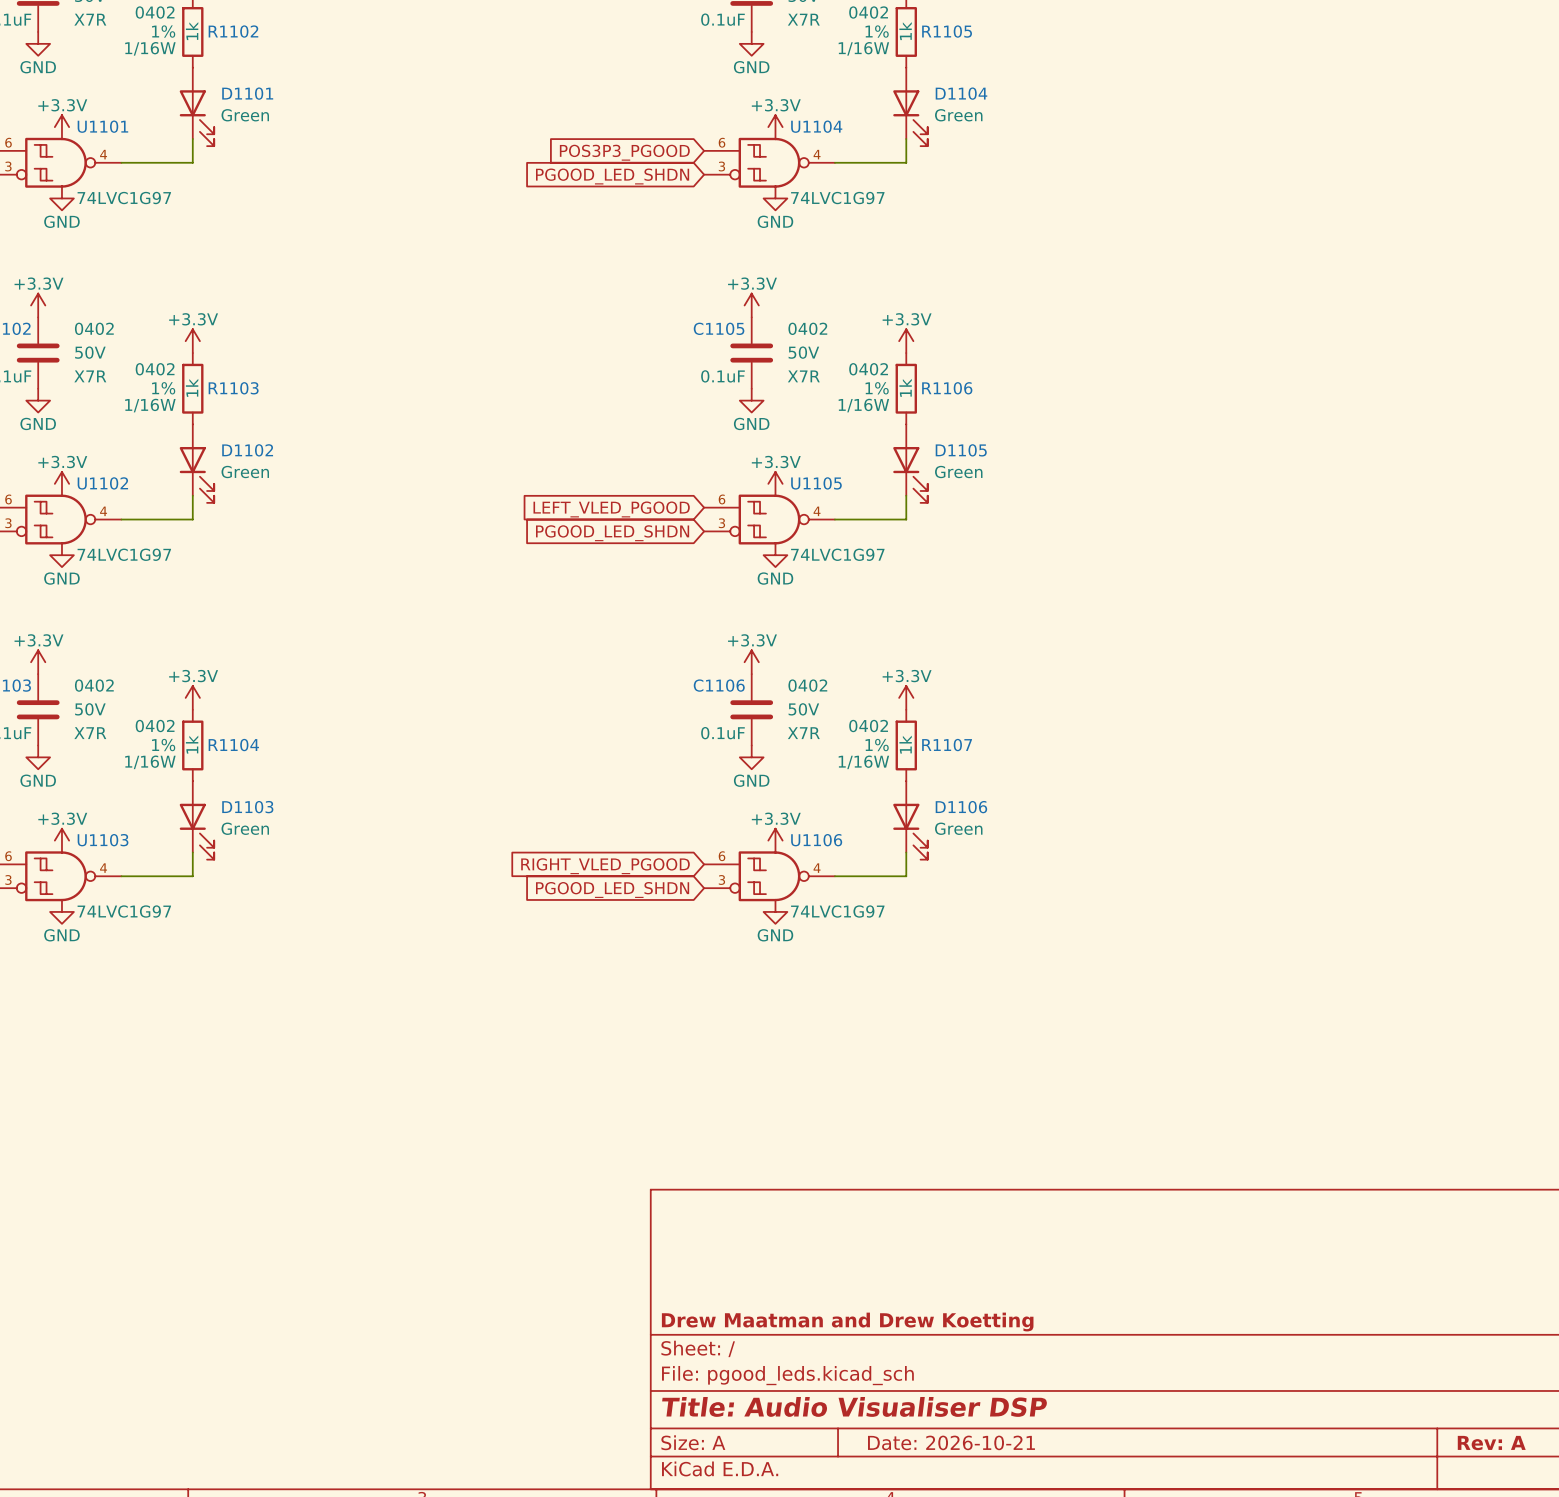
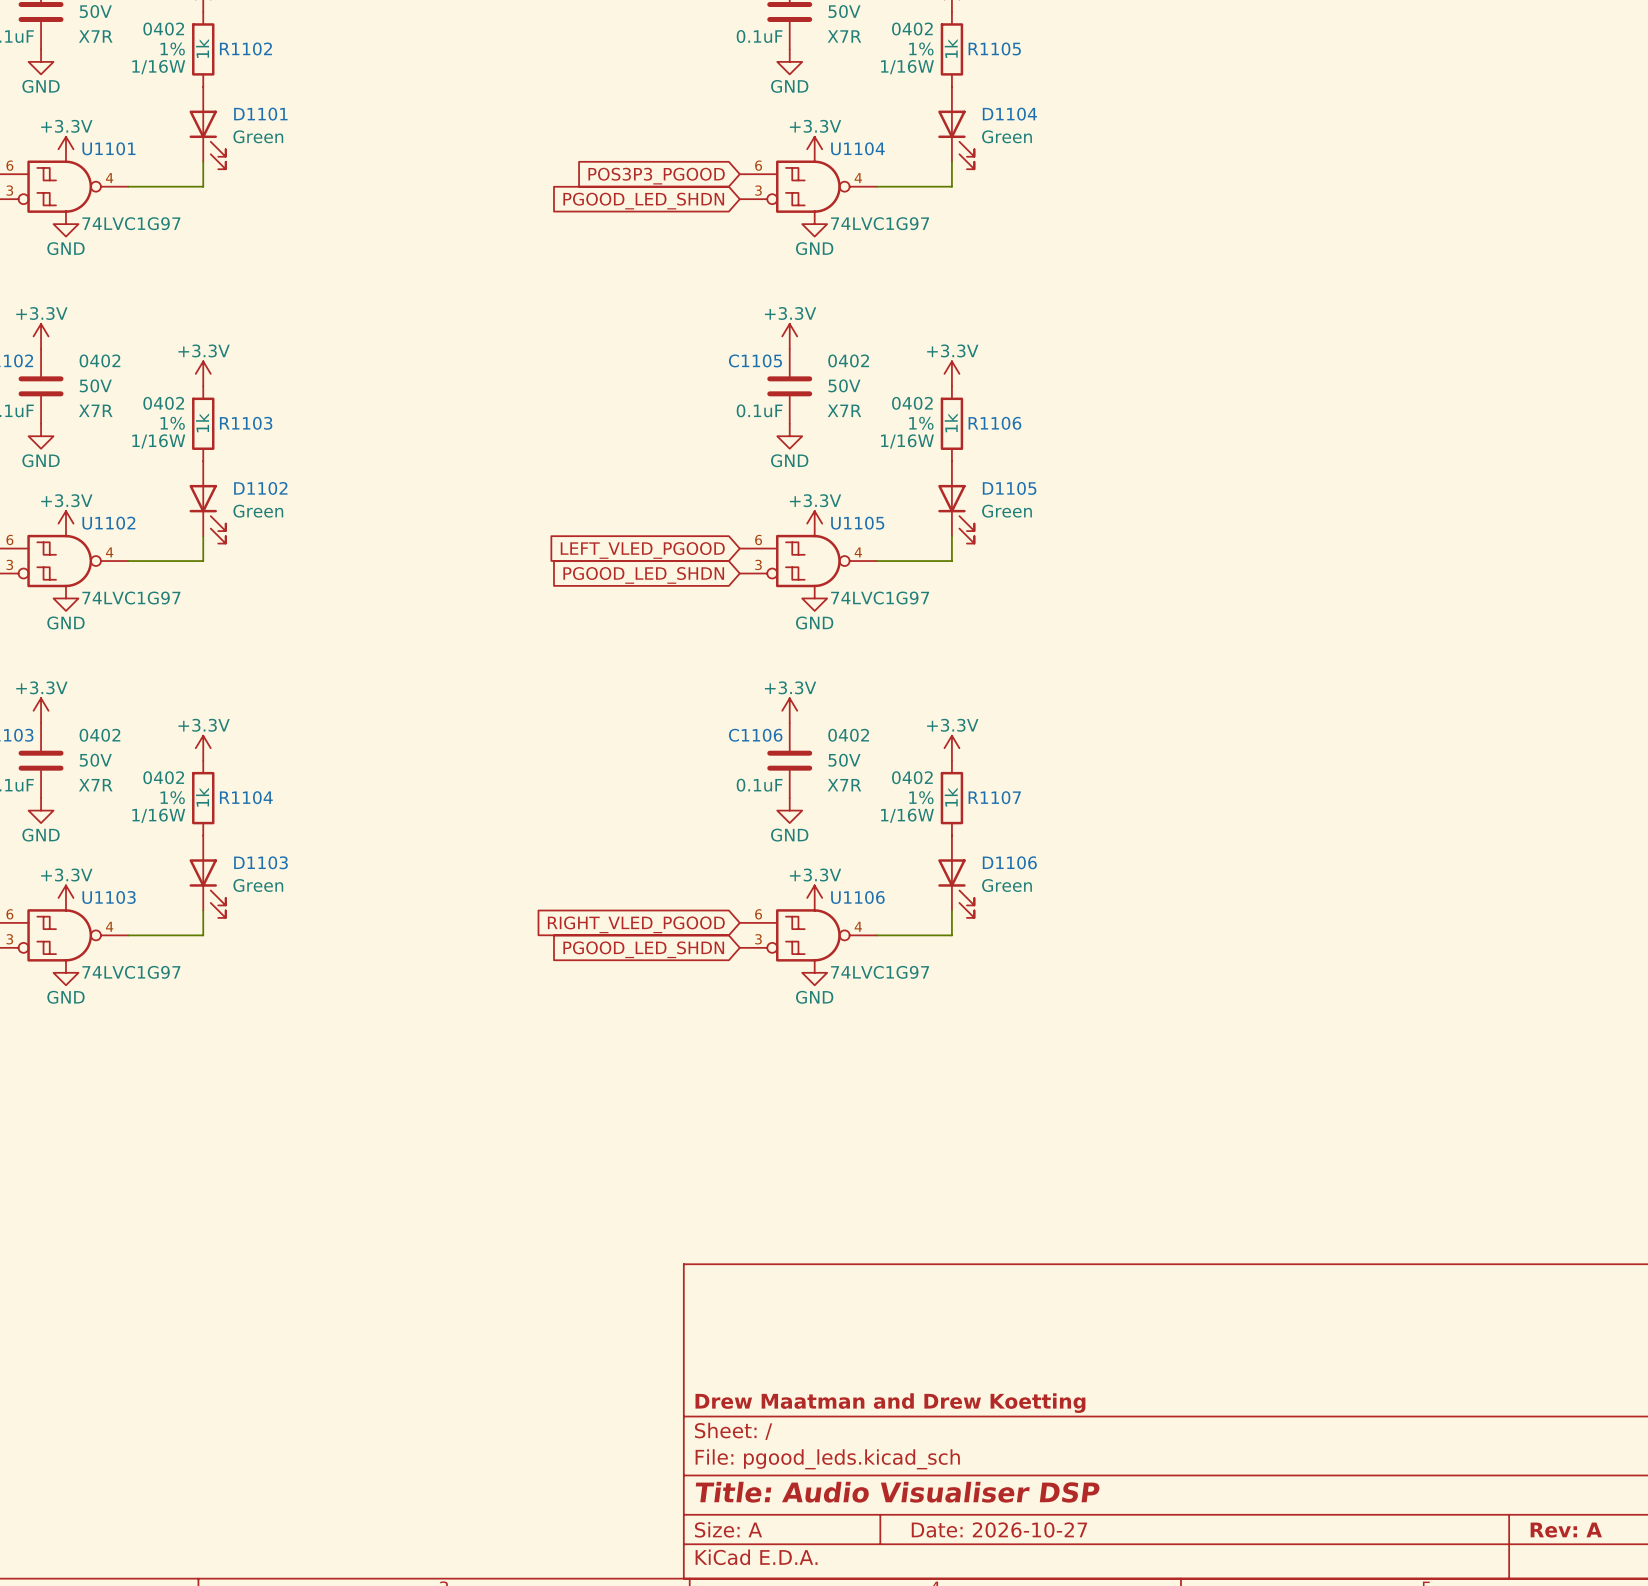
title block: Date: 2026-10-21 (951, 1442) -> Date: 2026-10-27 (999, 1529)

